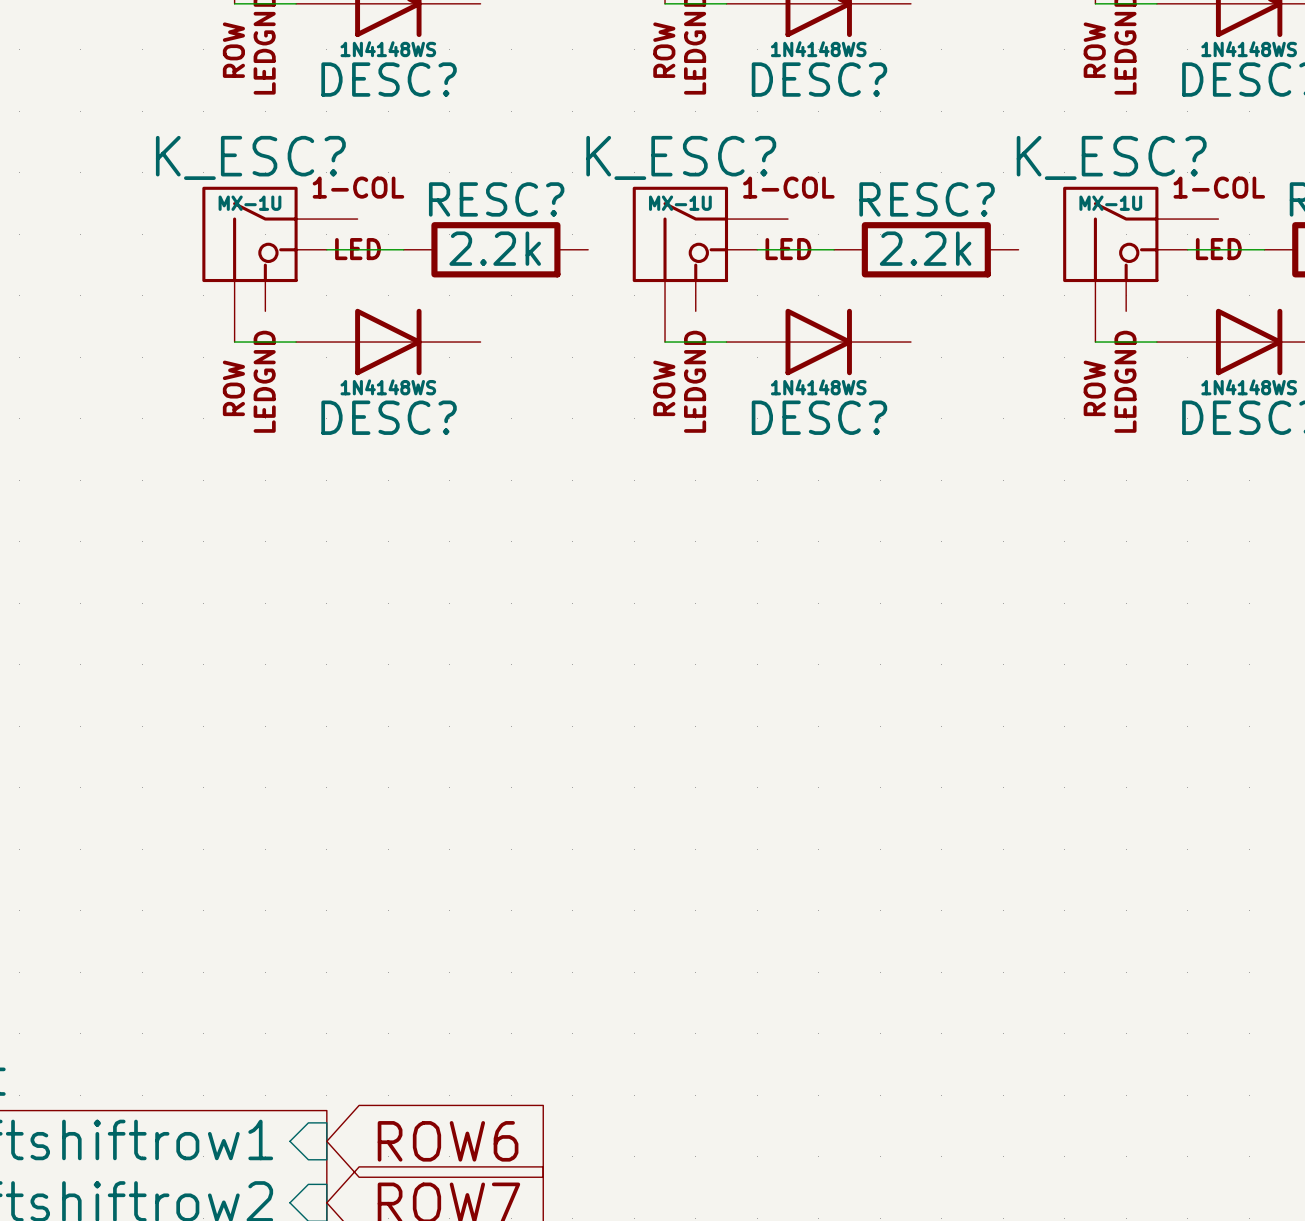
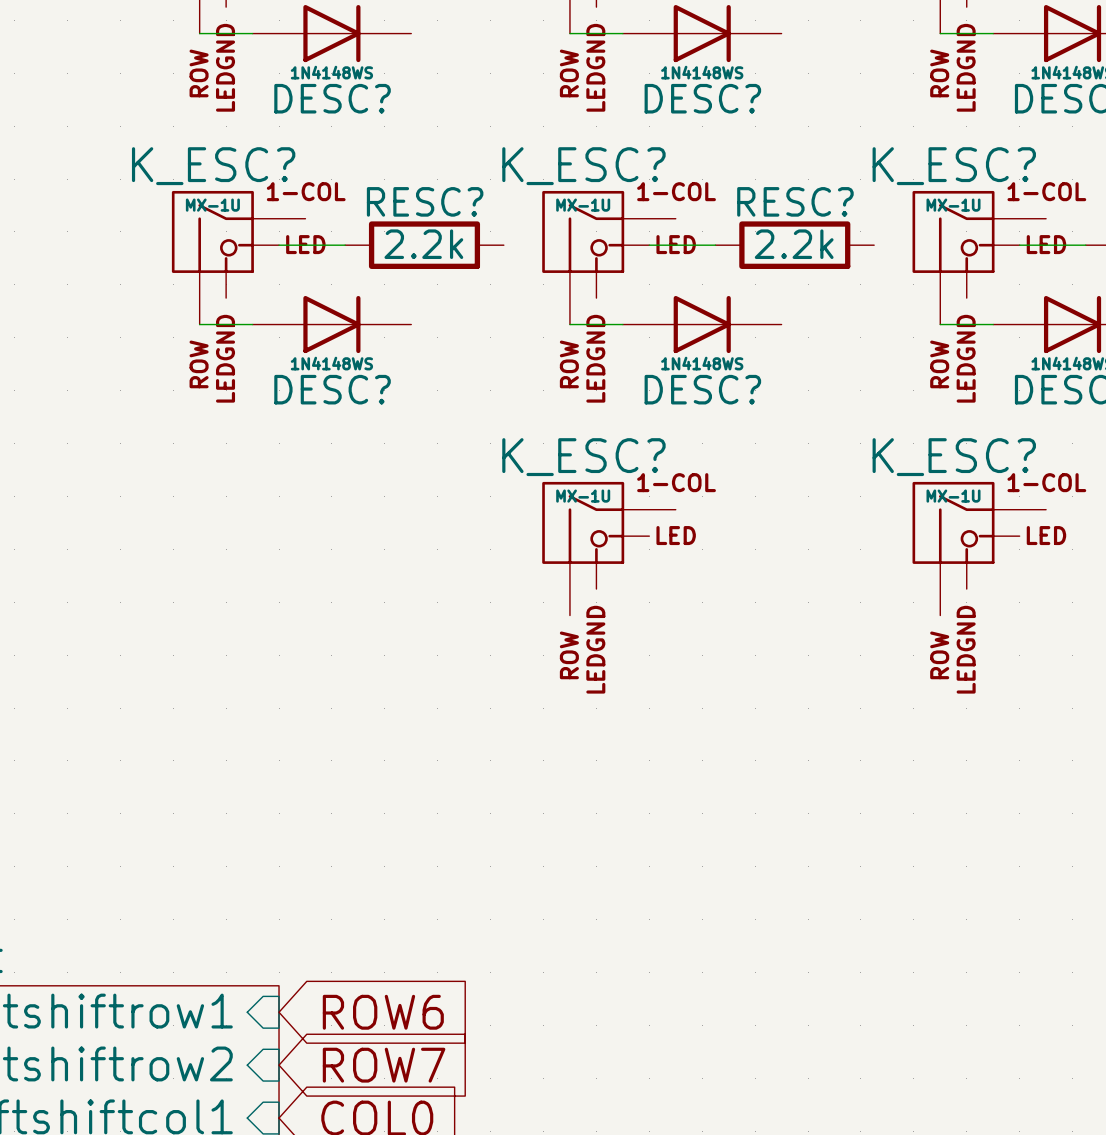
K_ESC?: none -> MX-1U (608, 548)
K_ESC?: none -> MX-1U (979, 548)

